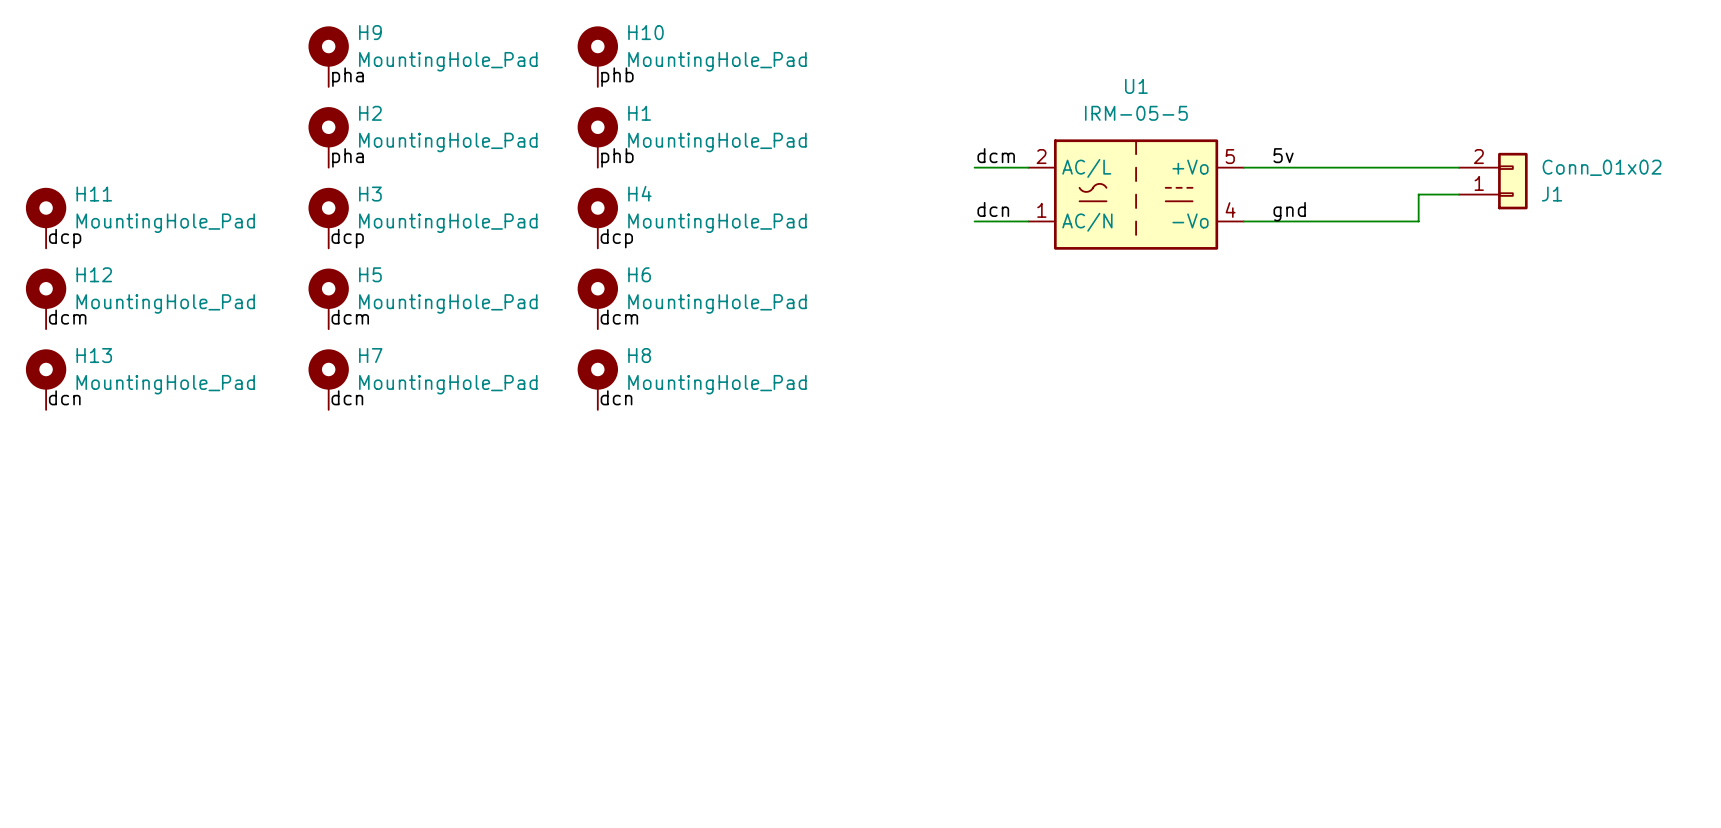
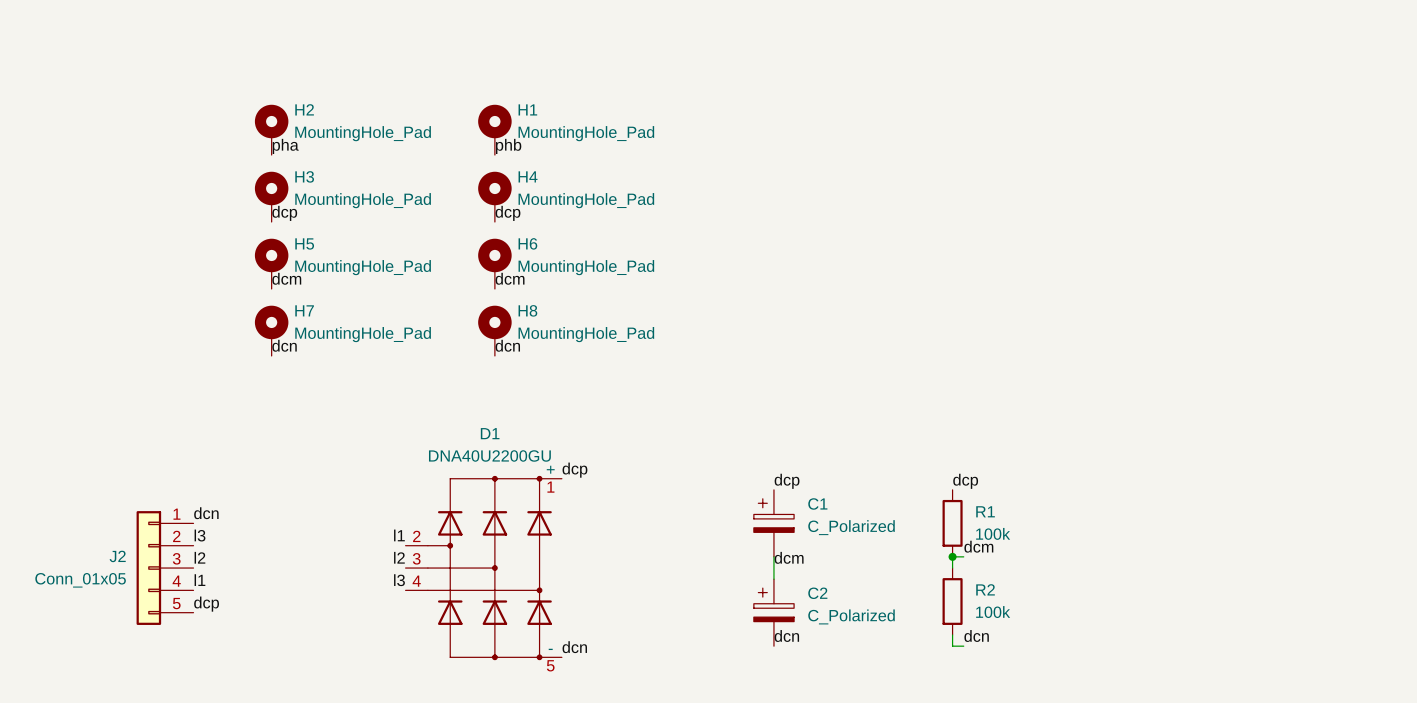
H9: MountingHole_Pad (328, 56) -> none
H10: MountingHole_Pad (597, 56) -> none
label: pha (348, 77) -> none
label: phb (617, 77) -> none
label: dcm (996, 155) -> none
label: 5v (1283, 155) -> none
wire: (974, 167) (1028, 167) -> none
wire: (1243, 167) (1459, 167) -> none
J1: Conn_01x02 (1493, 181) -> none
U1: IRM-05-5 (1136, 194) -> none
wire: (1459, 194) (1418, 194) (1418, 221) (1243, 221) -> none
label: dcn (993, 209) -> none
label: gnd (1289, 211) -> none
H11: MountingHole_Pad (46, 218) -> none
wire: (974, 221) (1028, 221) -> none
label: dcp (65, 238) -> none
H12: MountingHole_Pad (46, 298) -> none
label: dcm (67, 317) -> none
H13: MountingHole_Pad (46, 379) -> none
label: dcn (64, 397) -> none
label: none -> dcp (574, 470)
label: none -> dcp (787, 481)
label: none -> dcp (965, 481)
label: none -> dcn (206, 513)
C1: none -> C_Polarized (773, 523)
R1: none -> 100k (952, 523)
label: none -> l3 (200, 535)
label: none -> l1 (399, 535)
label: none -> dcm (978, 546)
wire: none -> (773, 556) (773, 579)
junction: none -> (952, 556)
wire: none -> (963, 556) (952, 556) (952, 568)
label: none -> l2 (199, 557)
label: none -> l2 (399, 557)
label: none -> dcm (789, 557)
J2: none -> Conn_01x05 (165, 568)
D1: none -> DNA40U2200GU (483, 568)
label: none -> l1 (199, 580)
label: none -> l3 (399, 580)
R2: none -> 100k (952, 601)
label: none -> dcp (206, 604)
C2: none -> C_Polarized (773, 612)
wire: none -> (952, 635) (952, 646) (963, 646)
label: none -> dcn (786, 635)
label: none -> dcn (976, 635)
label: none -> dcn (574, 647)

